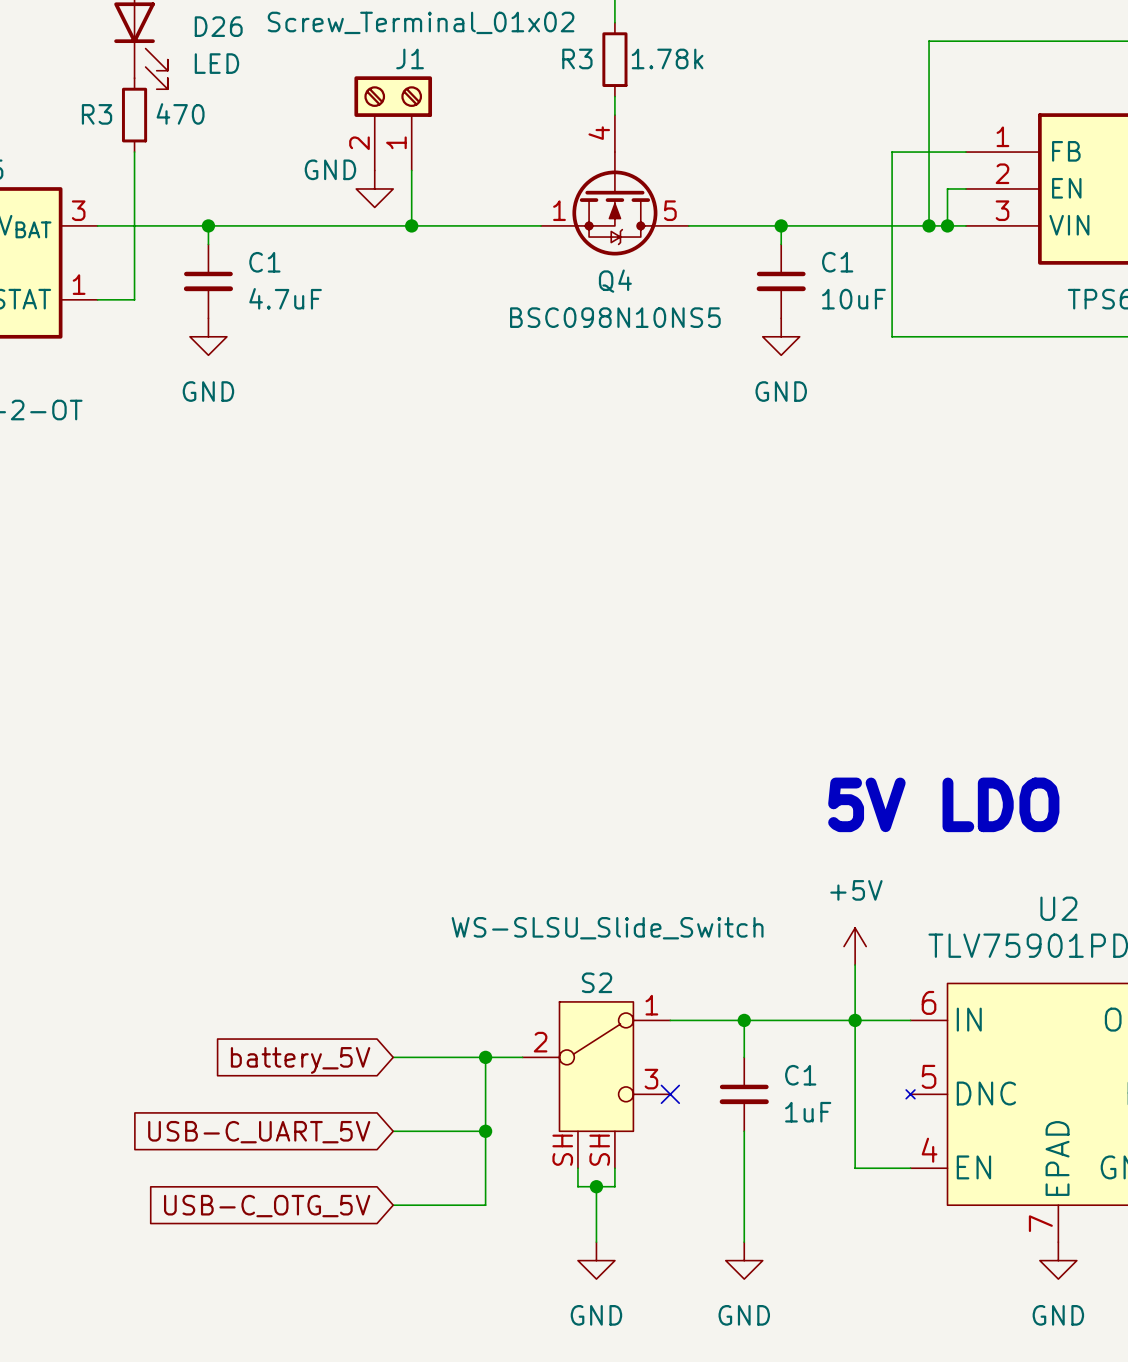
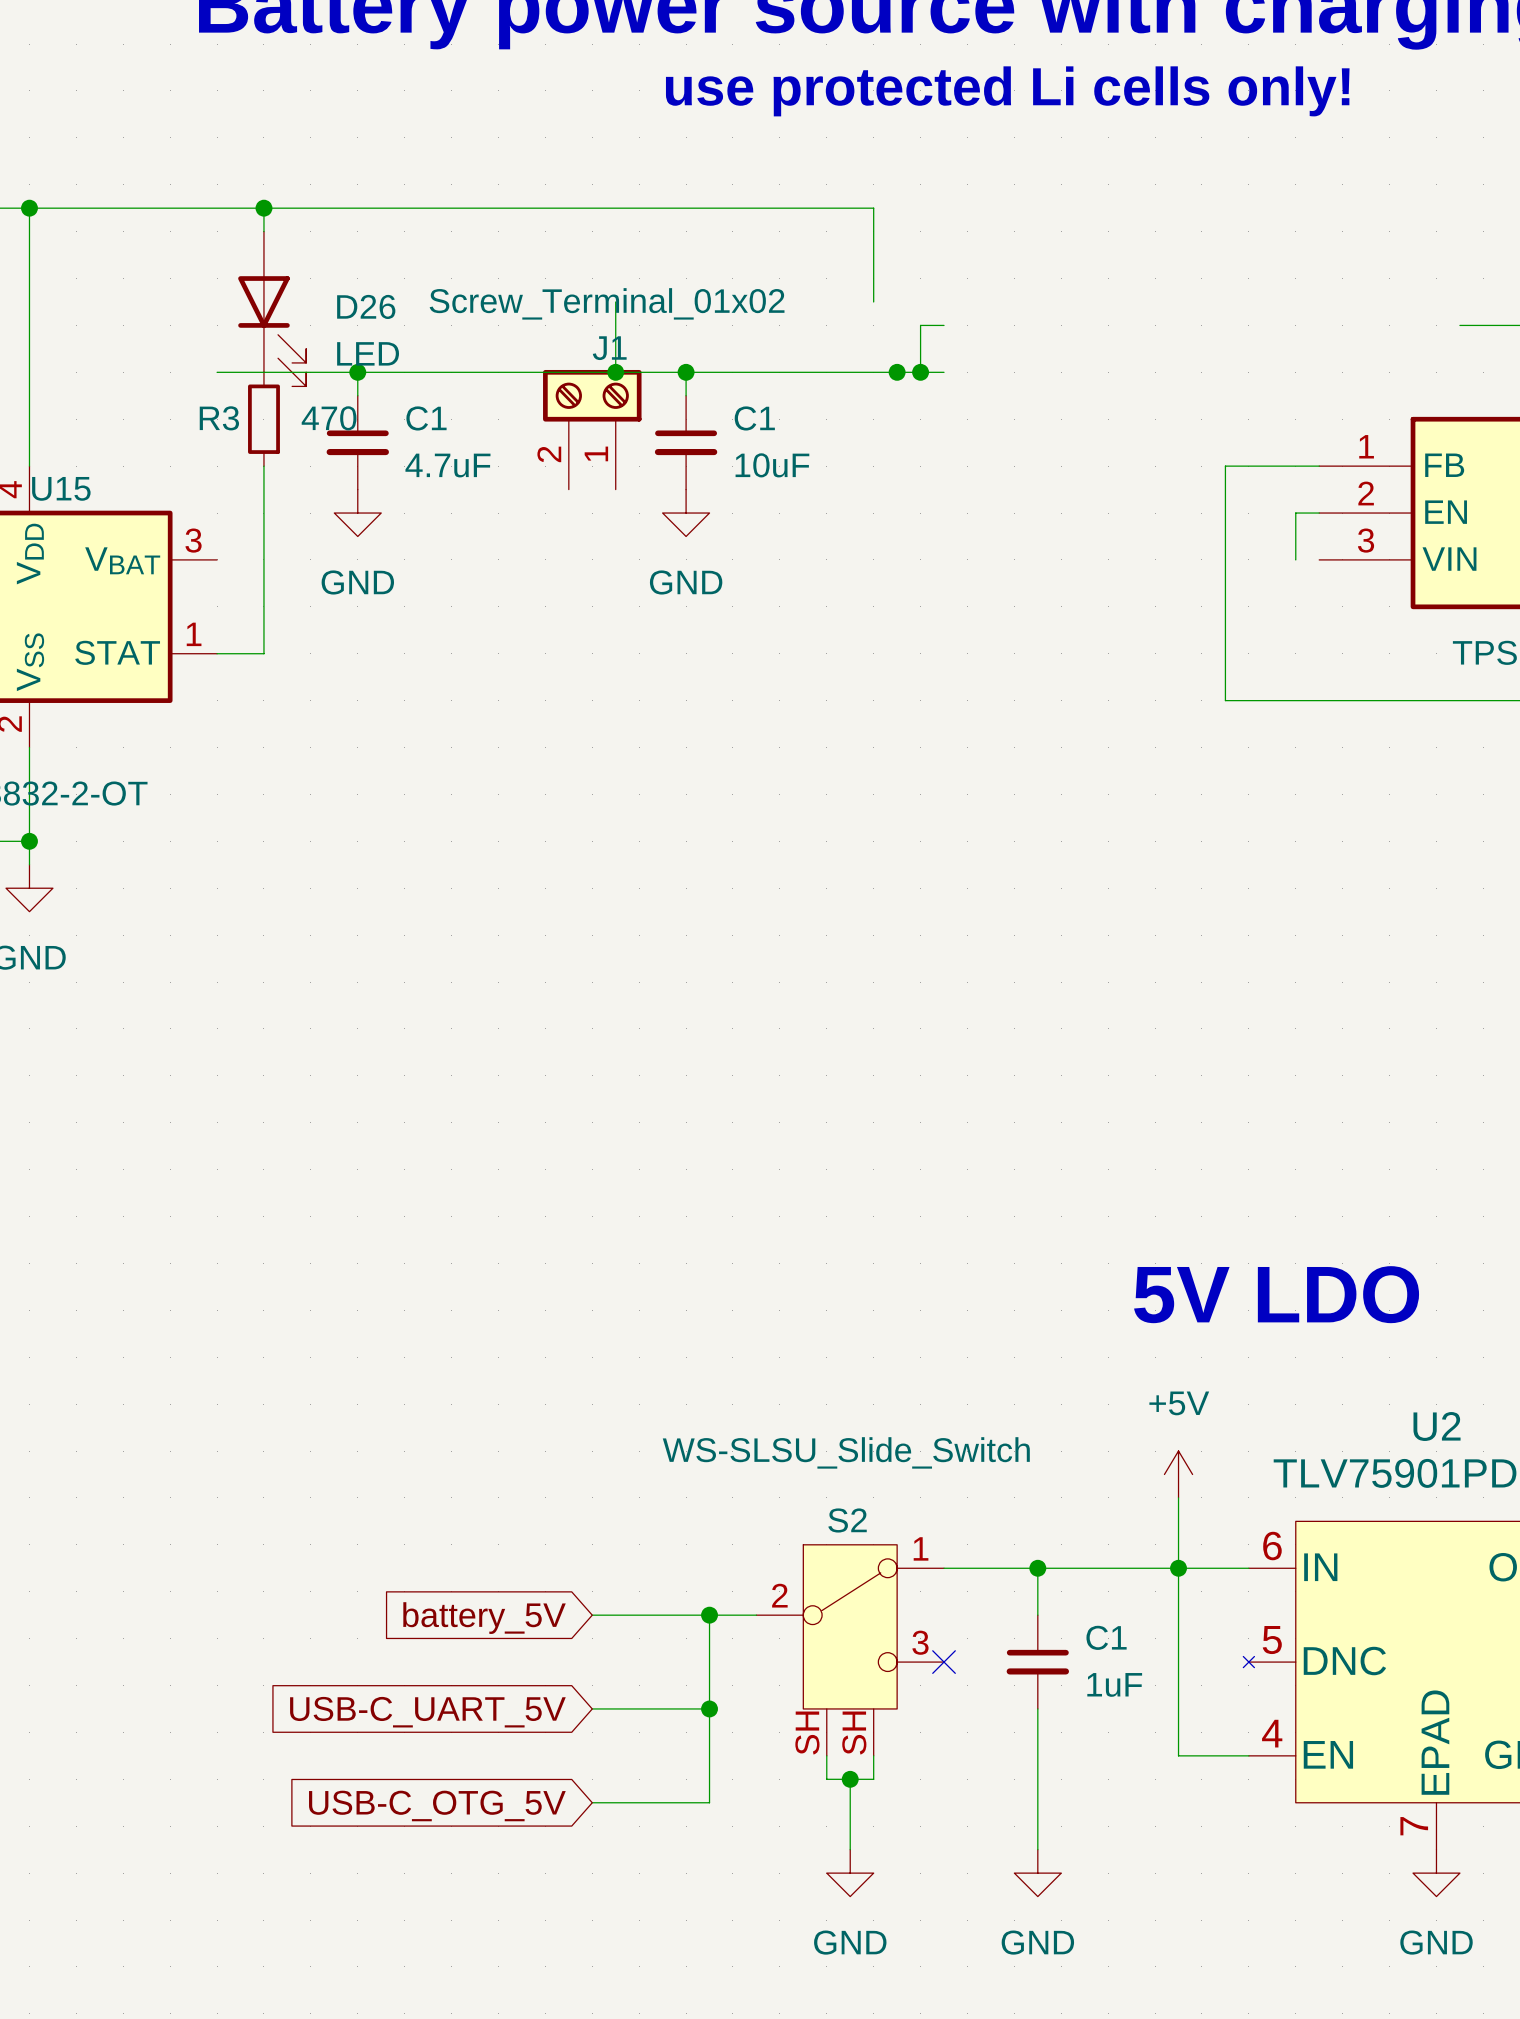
wire: none -> (944, 325) (920, 325) (920, 372)
wire: (1076, 41) (929, 41) (929, 225) -> none
R3: 1.78k (614, 59) -> none
wire: none -> (217, 372) (944, 372)
junction: none -> (357, 372)
junction: none -> (615, 372)
junction: none -> (686, 372)
junction: none -> (897, 372)
junction: none -> (920, 372)
wire: (614, 96) (614, 115) -> (686, 372) (686, 395)
wire: (411, 170) (411, 225) -> (615, 301) (615, 372)
Q4: BSC098N10NS5 (614, 185) -> none
power symbol: none -> GND (357, 513)
power symbol: GND (374, 188) -> none
power symbol: none -> GND (686, 513)
wire: (97, 225) (541, 225) -> none
wire: (208, 225) (208, 244) -> (357, 372) (357, 395)
junction: (208, 225) -> none
junction: (411, 225) -> none
wire: (688, 225) (965, 225) -> none
wire: (781, 225) (781, 244) -> none
junction: (781, 225) -> none
junction: (929, 225) -> none
junction: (947, 225) -> none
C1 position: (208, 281) -> (357, 442)
C1 position: (781, 281) -> (686, 442)
power symbol: GND (208, 336) -> none
power symbol: GND (781, 336) -> none

